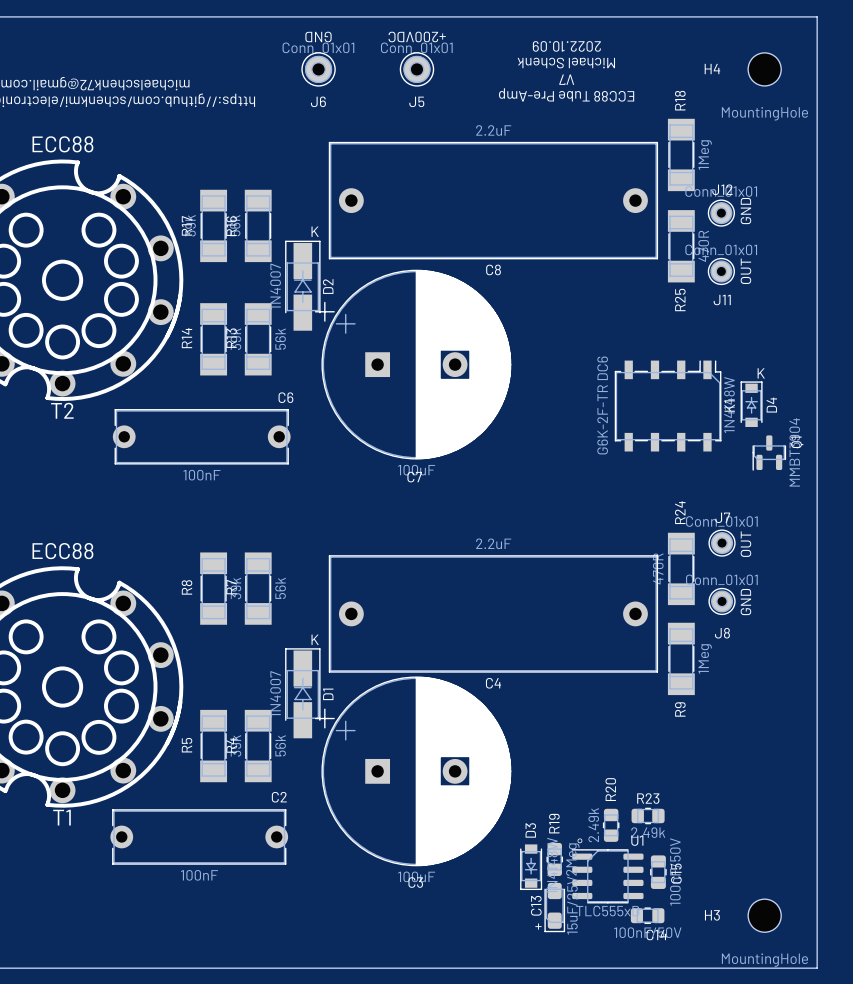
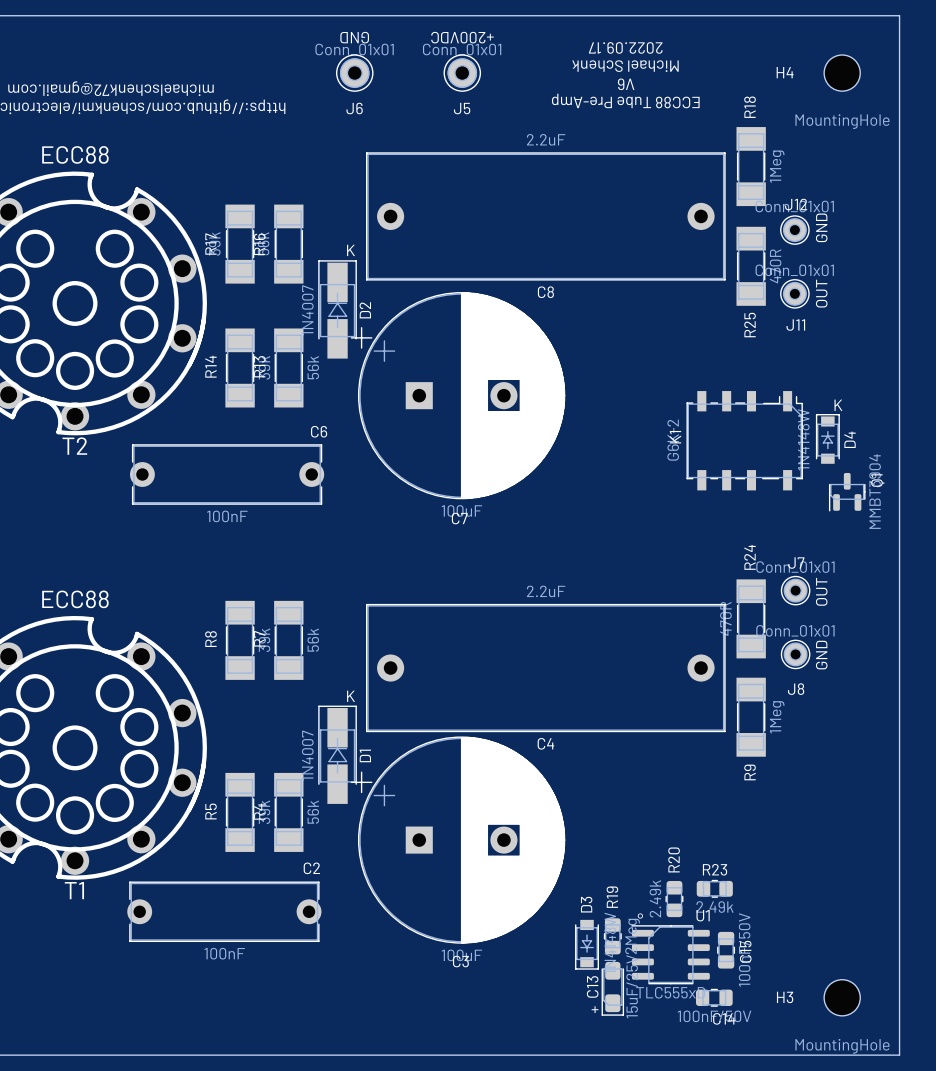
text: 2022.10.09 (566, 46) -> 2022.09.17 (625, 47)
text: V7 (566, 79) -> V6 (626, 84)
K1 footprint: [614, 360, 722, 452] -> [686, 391, 803, 491]
K1 value: G6K-2F-TR DC6 (602, 405) -> G6K-2 (673, 440)
K1 name position: K1 (729, 406) -> K1 (675, 437)

